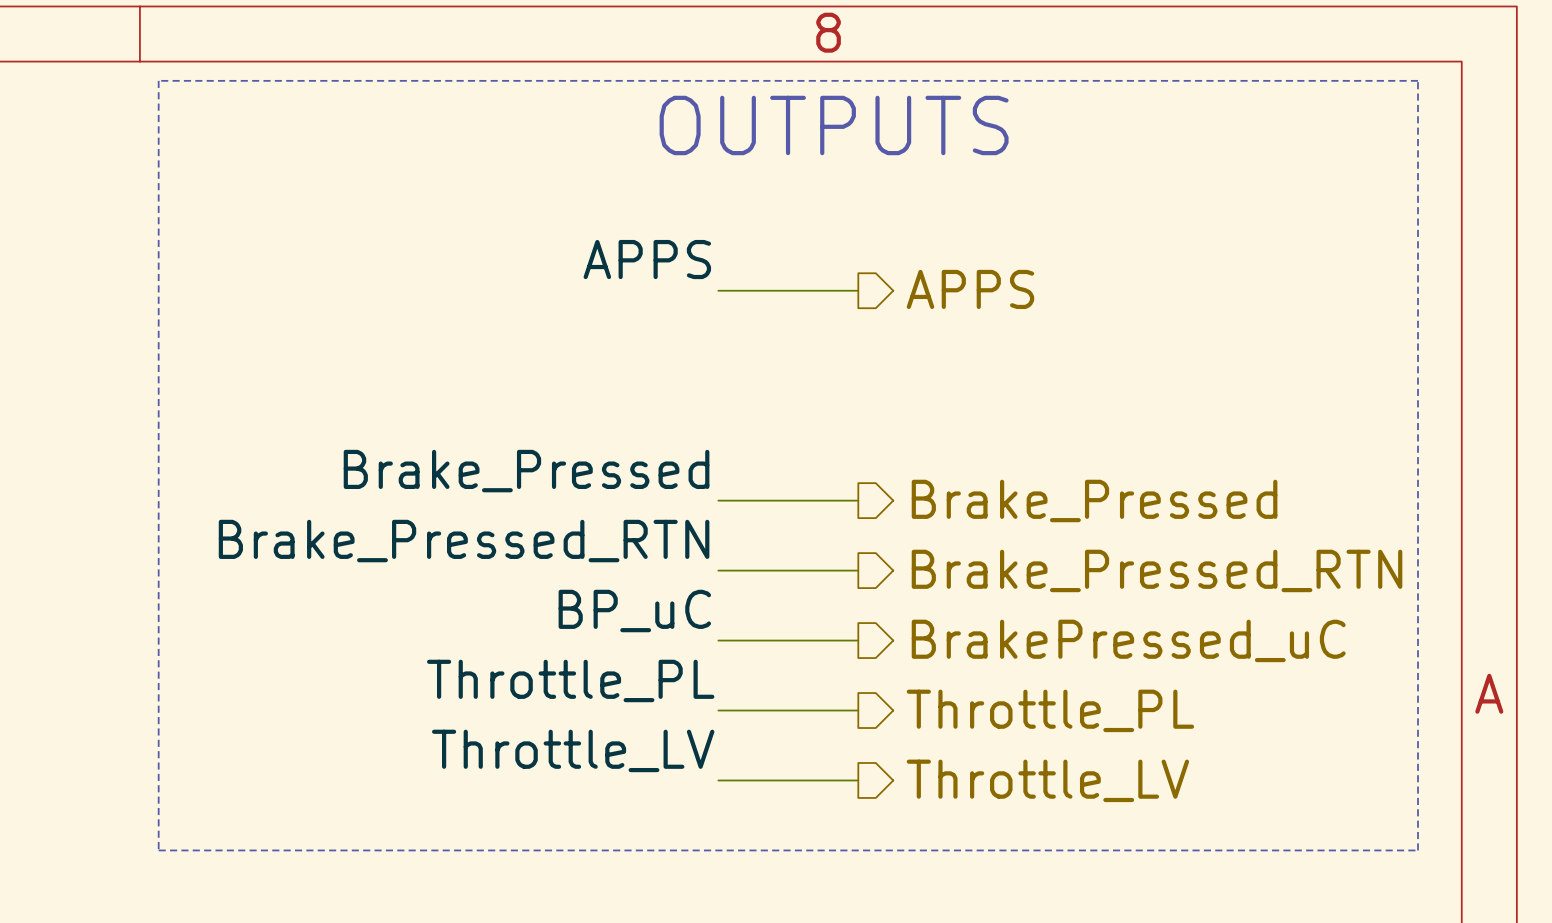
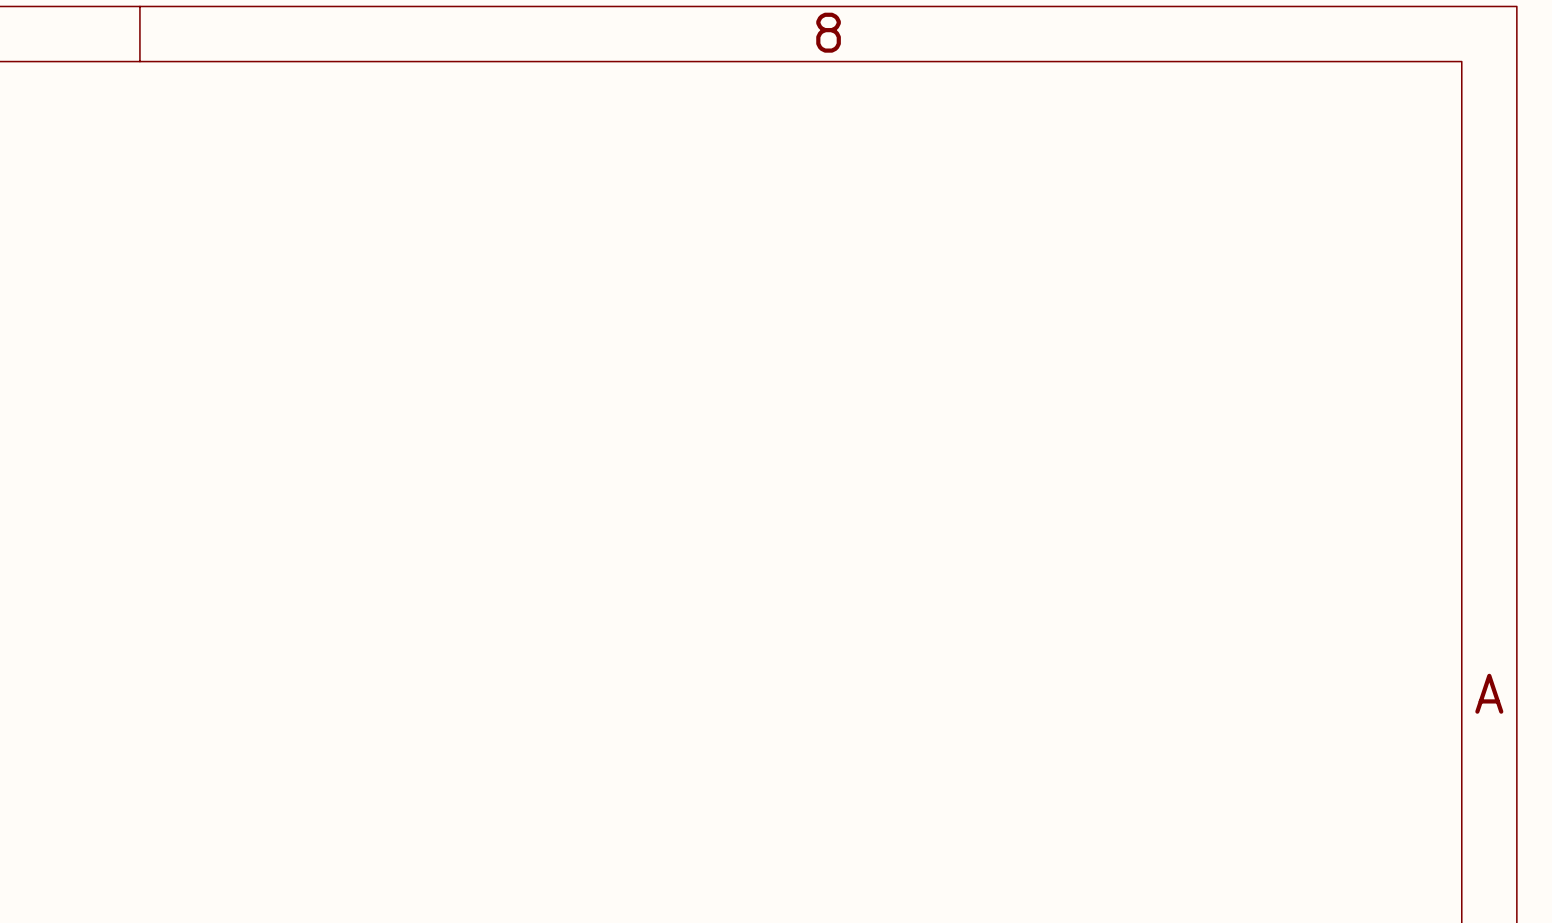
line: (158, 80) (158, 850) (1418, 850) (1418, 80) (158, 80) -> none
text: OUTPUTS (834, 125) -> none
label: APPS (647, 259) -> none
hierarchical label: APPS (970, 289) -> none
wire: (718, 290) (858, 290) -> none
label: Brake_Pressed (526, 471) -> none
wire: (718, 500) (858, 500) -> none
hierarchical label: Brake_Pressed (1094, 500) -> none
label: Brake_Pressed_RTN (464, 541) -> none
wire: (718, 570) (858, 570) -> none
hierarchical label: Brake_Pressed_RTN (1157, 570) -> none
label: BP_uC (634, 611) -> none
wire: (718, 640) (858, 640) -> none
hierarchical label: BrakePressed_uC (1128, 640) -> none
label: Throttle_PL (570, 680) -> none
wire: (718, 710) (858, 710) -> none
hierarchical label: Throttle_PL (1050, 710) -> none
label: Throttle_LV (573, 750) -> none
wire: (718, 780) (858, 780) -> none
hierarchical label: Throttle_LV (1047, 780) -> none

